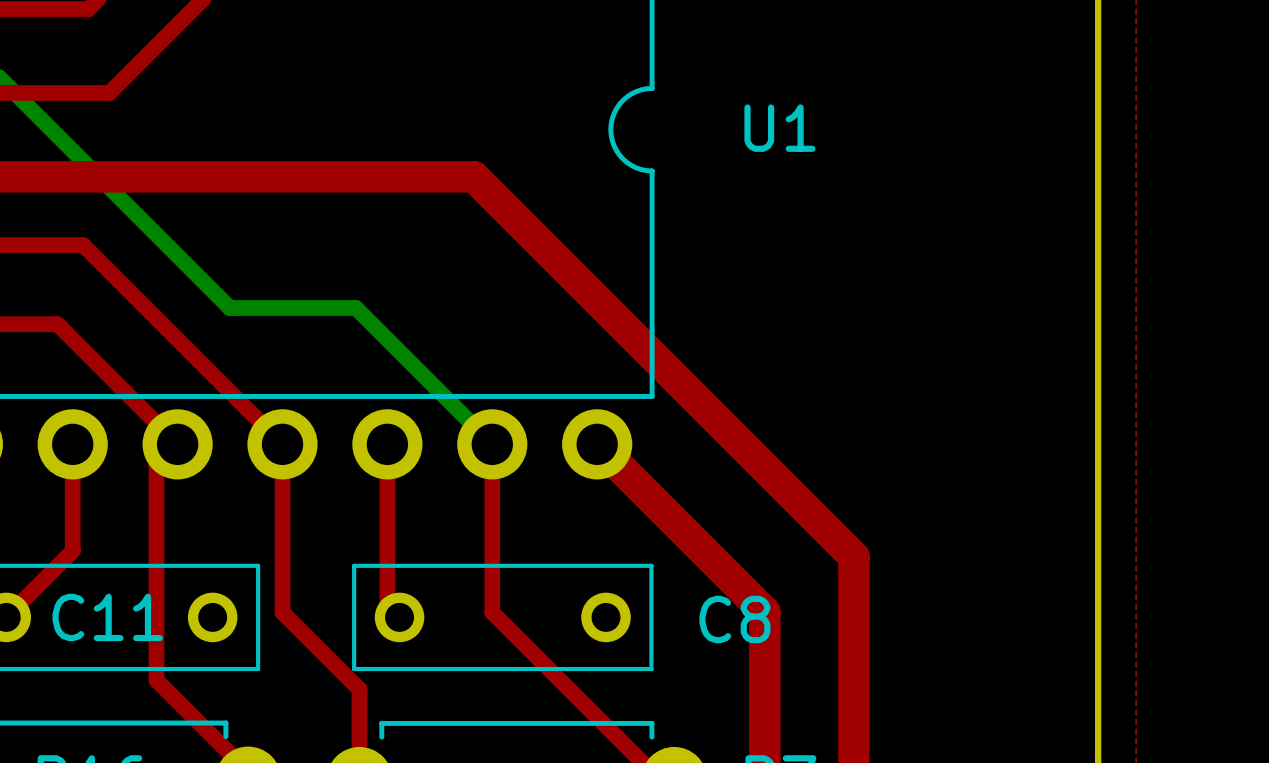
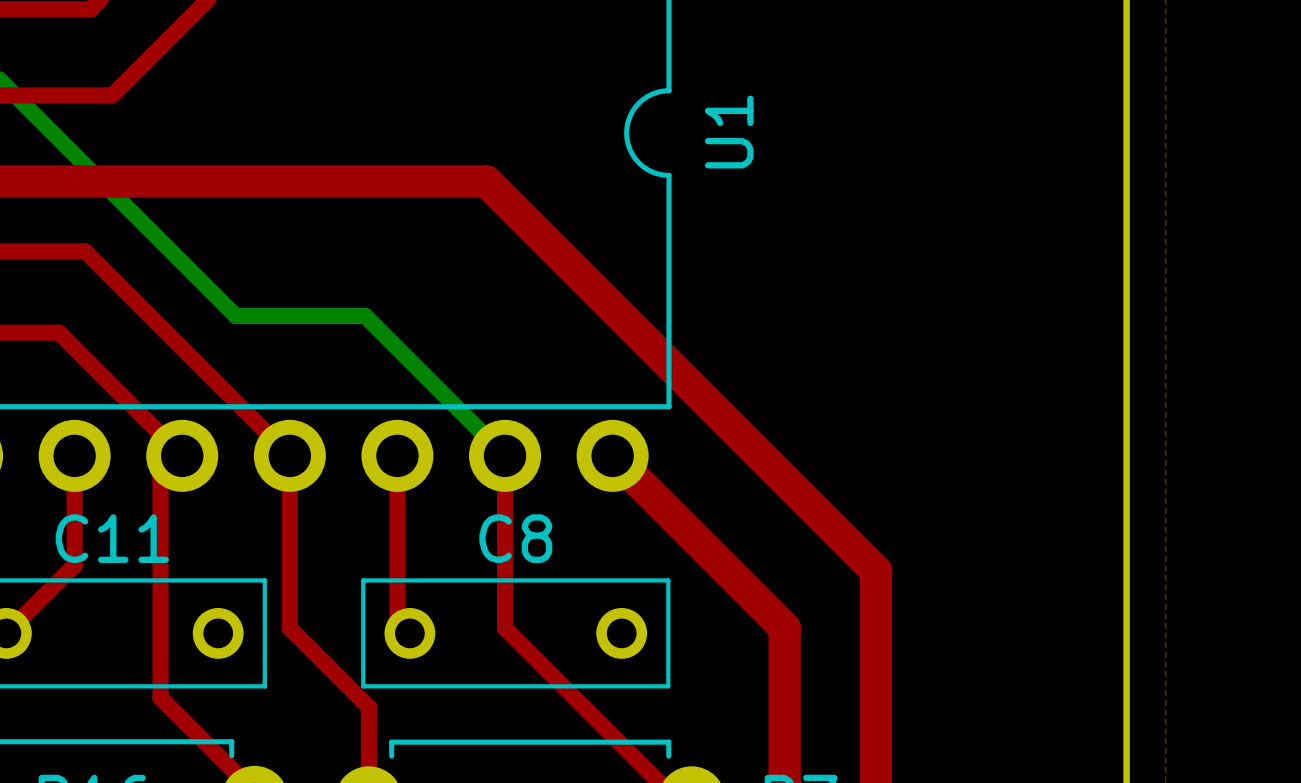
U1 name rotation: 0° (779, 128) -> 90° counterclockwise (729, 132)
C11 name position: C11 (107, 617) -> C11 (112, 538)
C8 name position: C8 (734, 619) -> C8 (515, 538)

